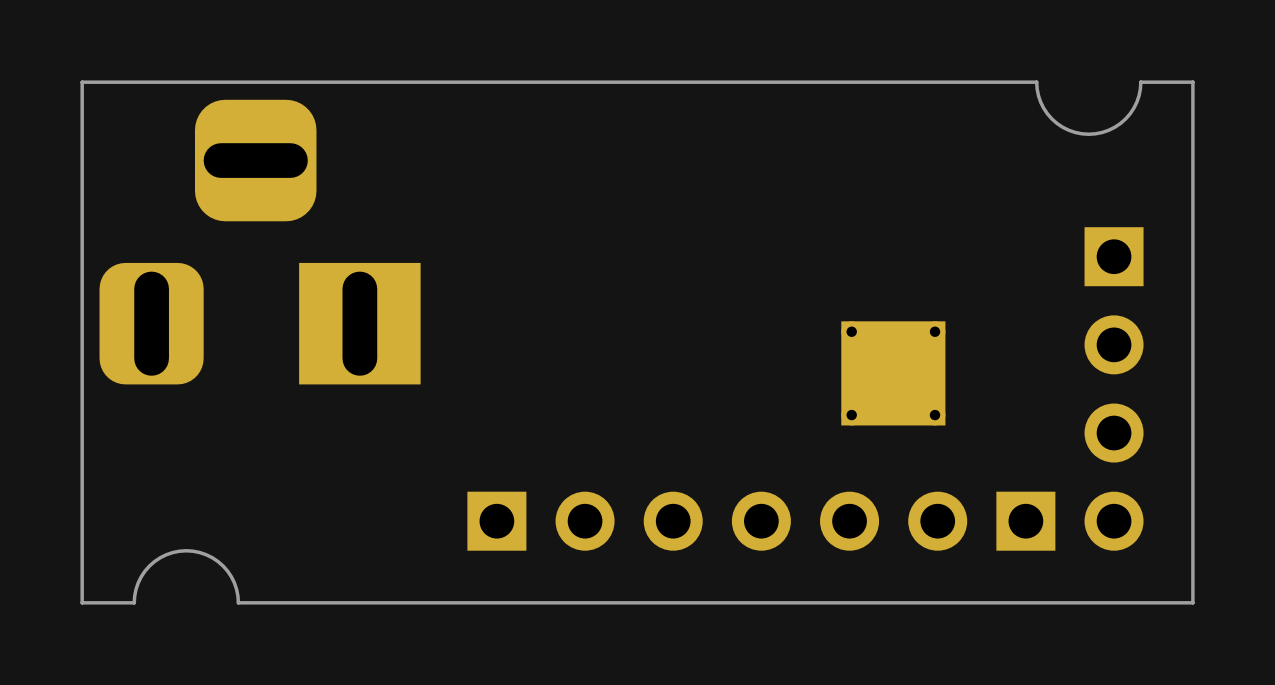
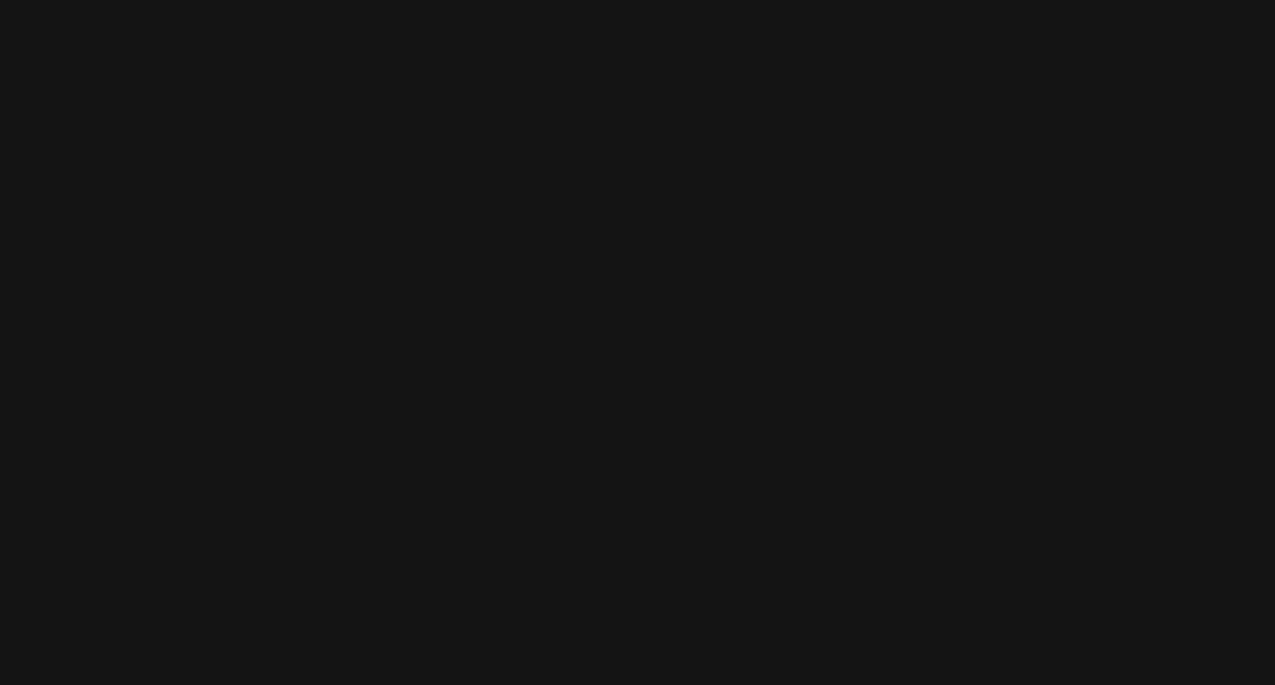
board edge: (1192, 82) (1140, 82) (1136, 102) (1125, 119) (1108, 130) (1088, 134) (1068, 130) (1051, 119) (1040, 102) (1036, 82) (82, 82) (82, 602) (134, 602) (138, 582) (149, 566) (166, 554) (186, 550) (206, 554) (223, 566) (234, 582) (238, 602) (1192, 602) (1192, 82) -> none
part: (260, 242) -> none
part: (893, 373) -> none
part: (1114, 388) -> none
part: (540, 521) -> none
part: (849, 521) -> none

